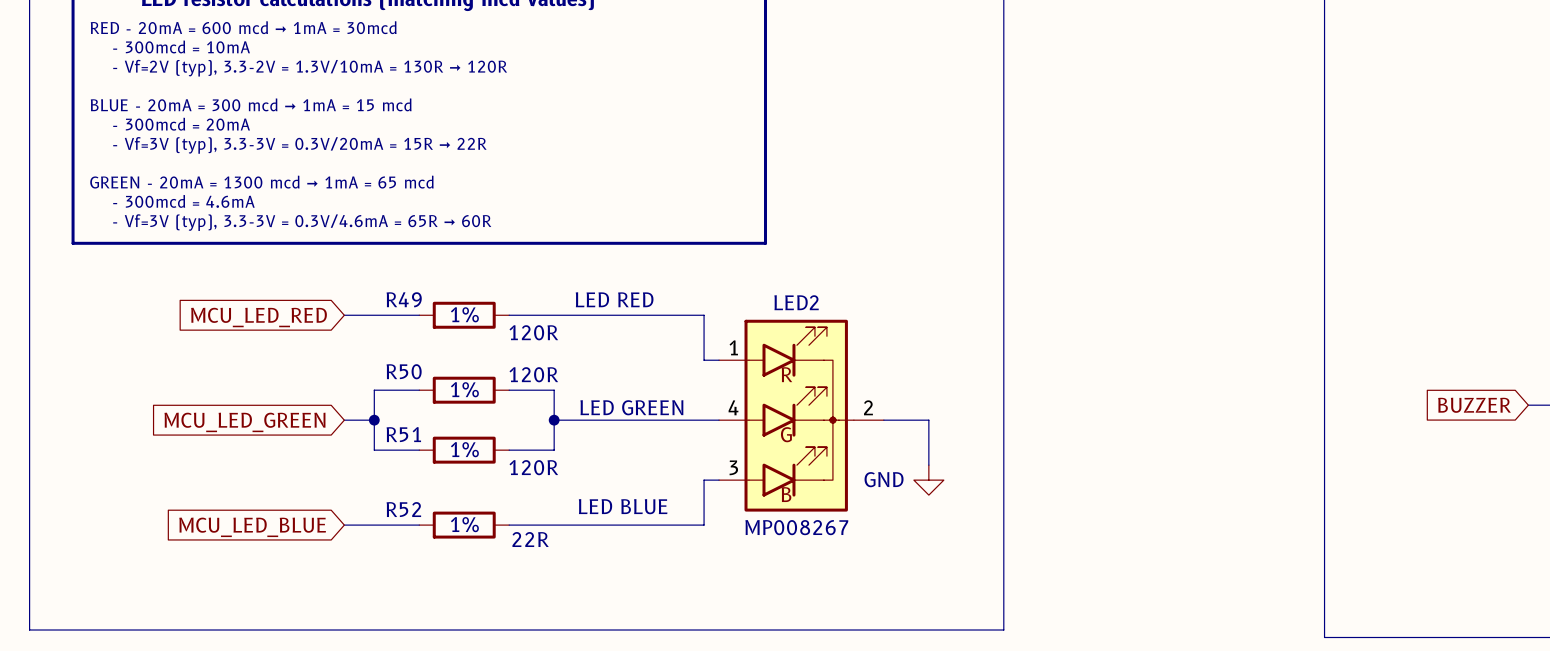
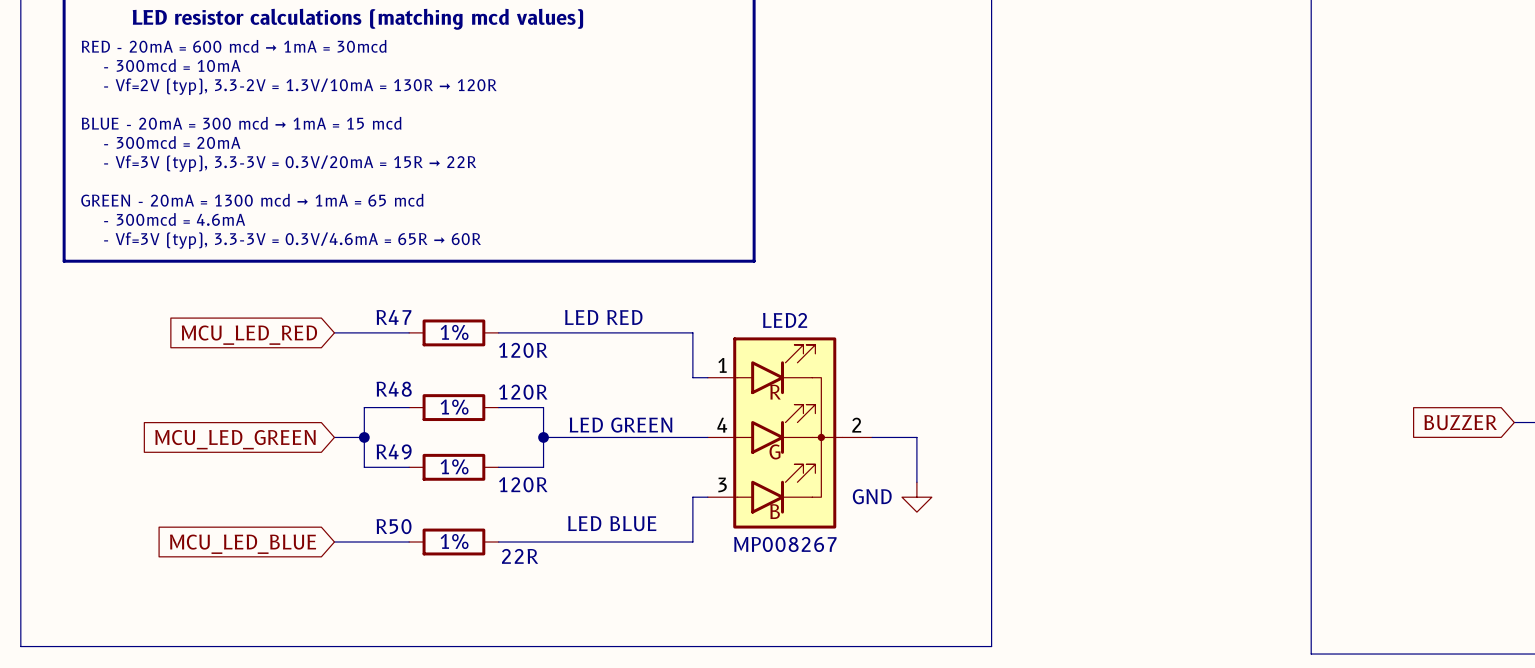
R49 name: R49 (404, 299) -> R47 (393, 317)
R50 name: R50 (404, 371) -> R48 (394, 389)
R51 name: R51 (403, 434) -> R49 (394, 451)
R52 name: R52 (403, 509) -> R50 (394, 526)

